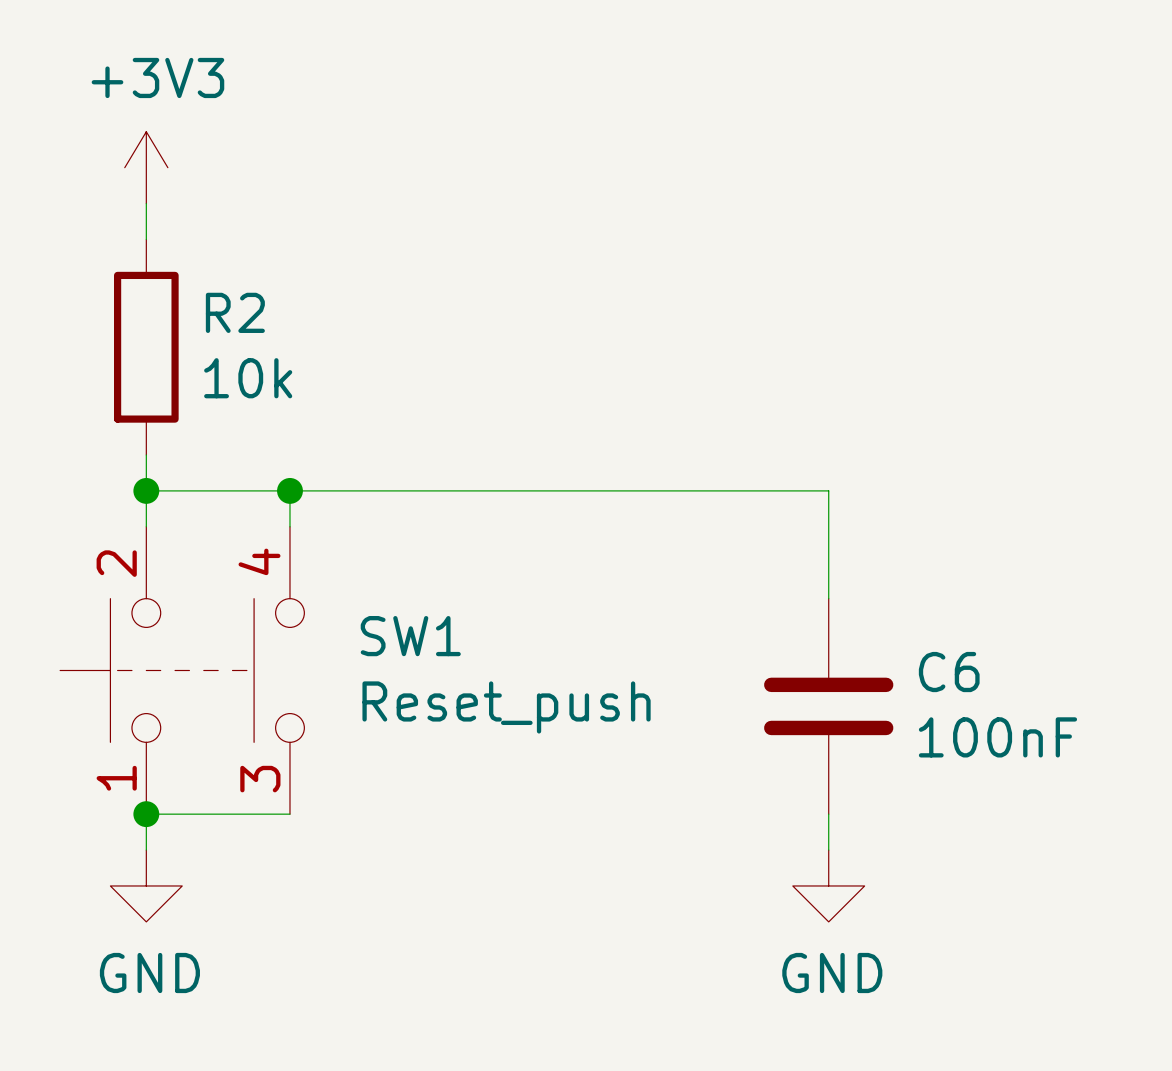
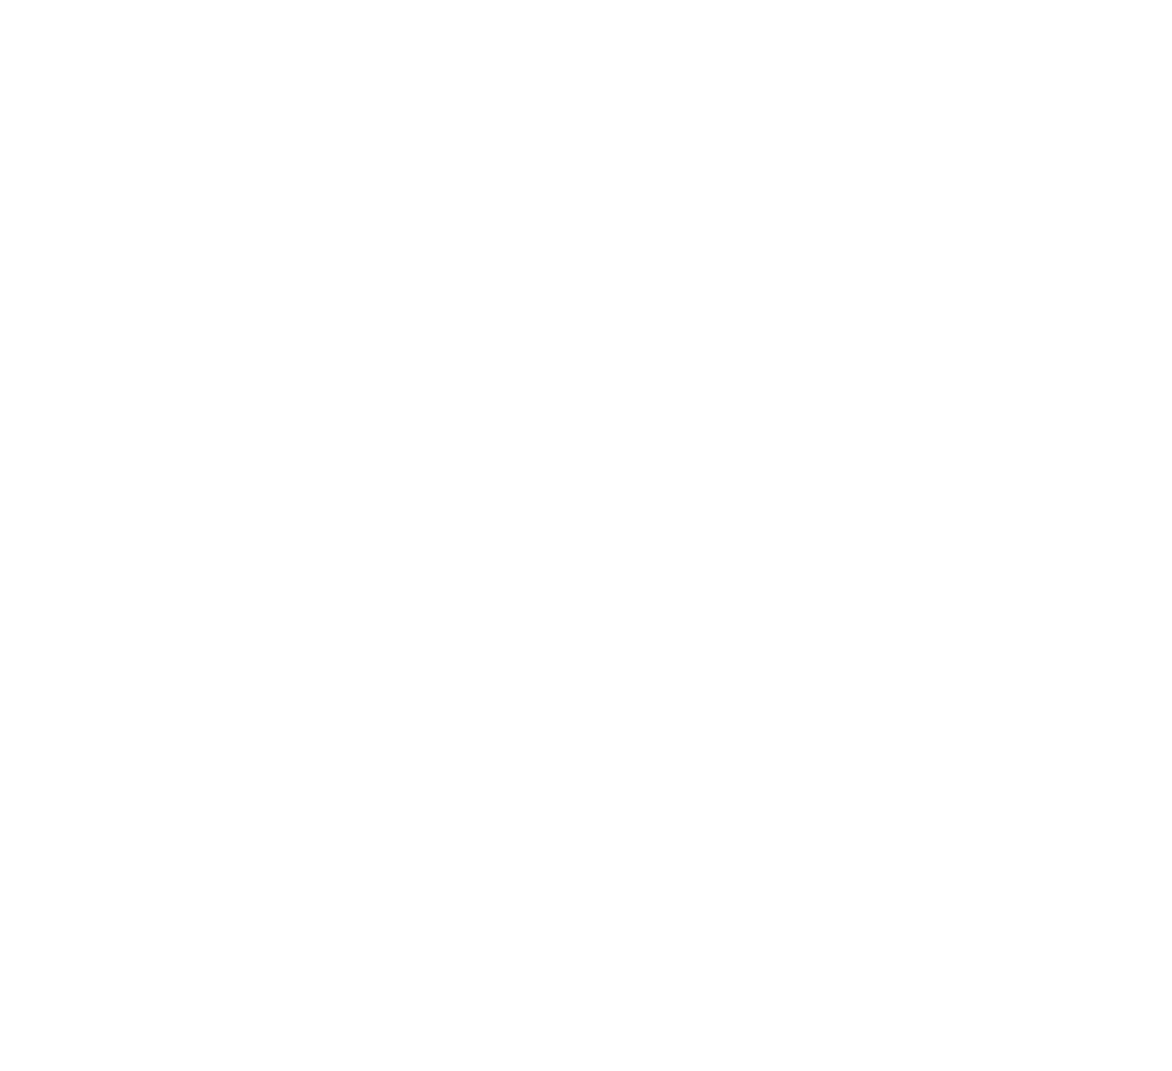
power symbol: +3V3 (146, 167) -> none
wire: (146, 203) (146, 239) -> none
R2: 10k (146, 347) -> none
wire: (146, 455) (146, 526) -> none
wire: (146, 490) (828, 490) (828, 598) -> none
junction: (146, 490) -> none
wire: (289, 490) (289, 526) -> none
junction: (289, 490) -> none
SW1: Reset_push (182, 670) -> none
C6: 100nF (828, 706) -> none
junction: (146, 814) -> none
wire: (289, 814) (146, 814) (146, 850) -> none
wire: (828, 814) (828, 850) -> none
power symbol: GND (146, 885) -> none
power symbol: GND (828, 885) -> none

